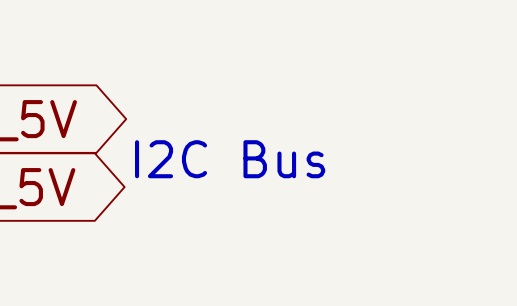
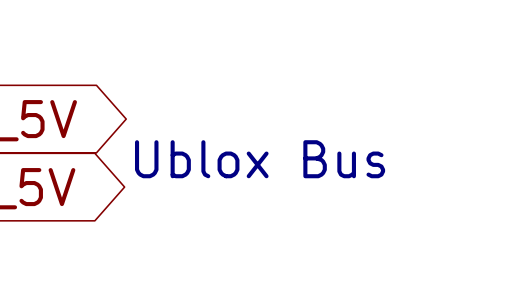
text: I2C Bus (230, 159) -> Ublox Bus (260, 159)

